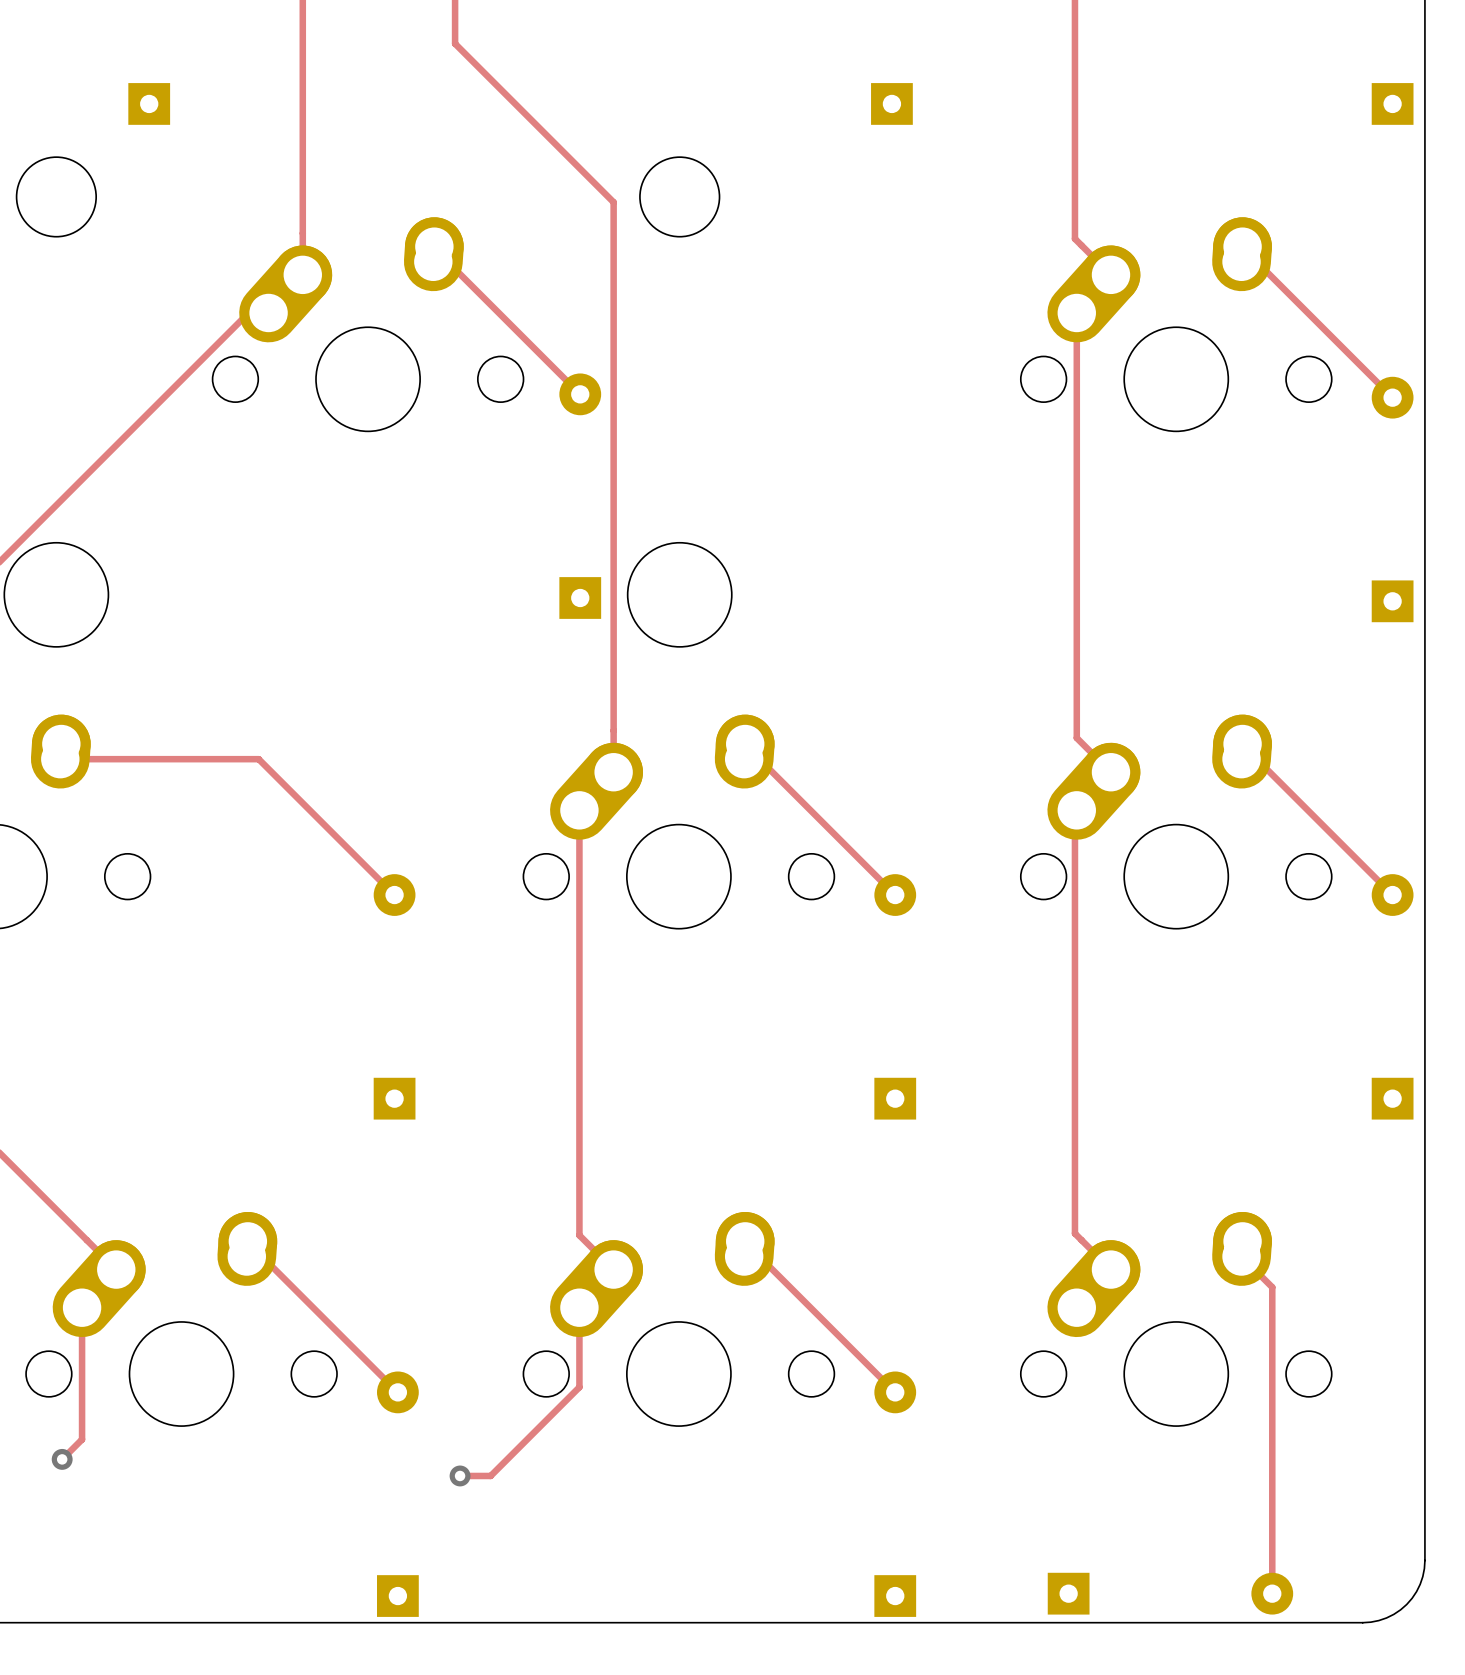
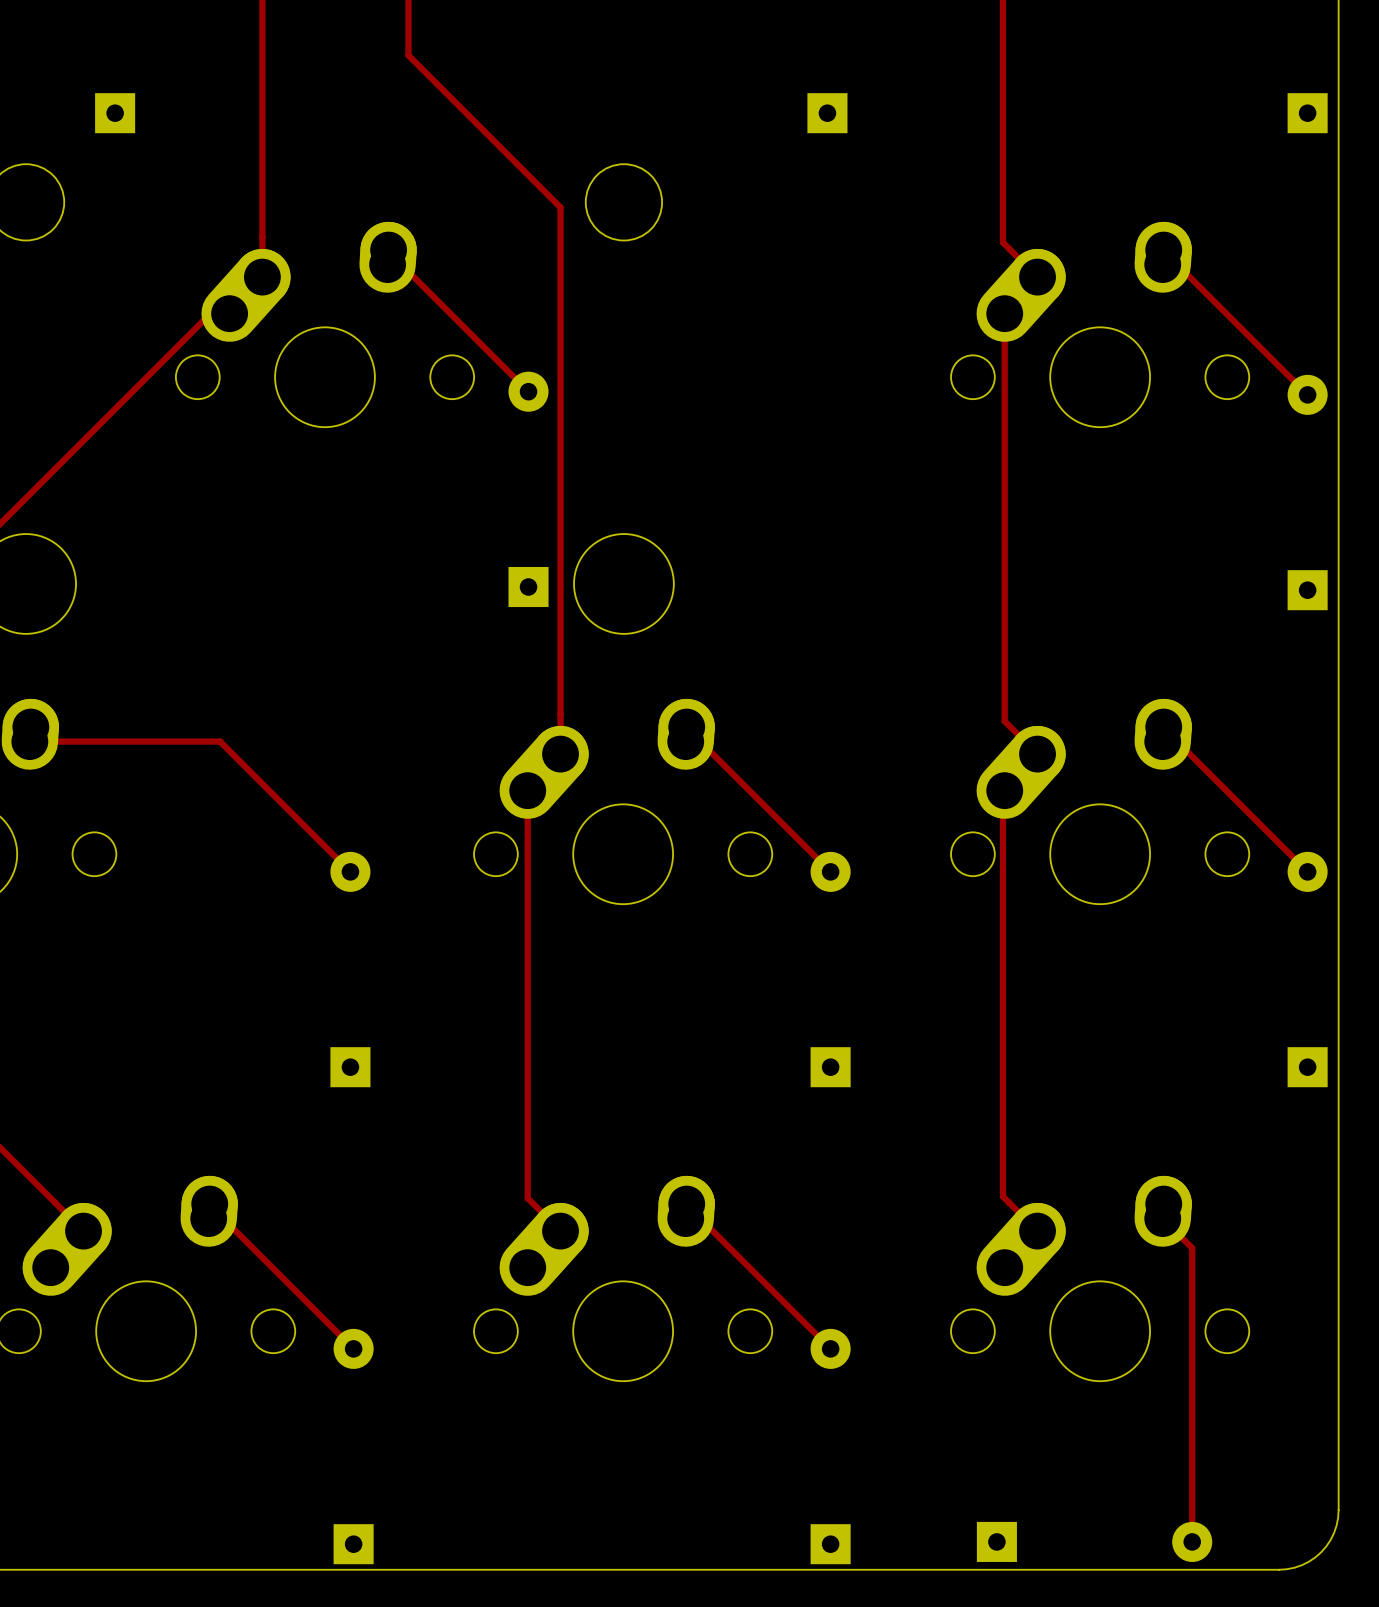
track: (82, 1307) (82, 1439) (62, 1459) -> none
track: (579, 1307) (579, 1387) (490, 1475) (460, 1475) -> none
via: (62, 1459) -> none
via: (460, 1475) -> none

